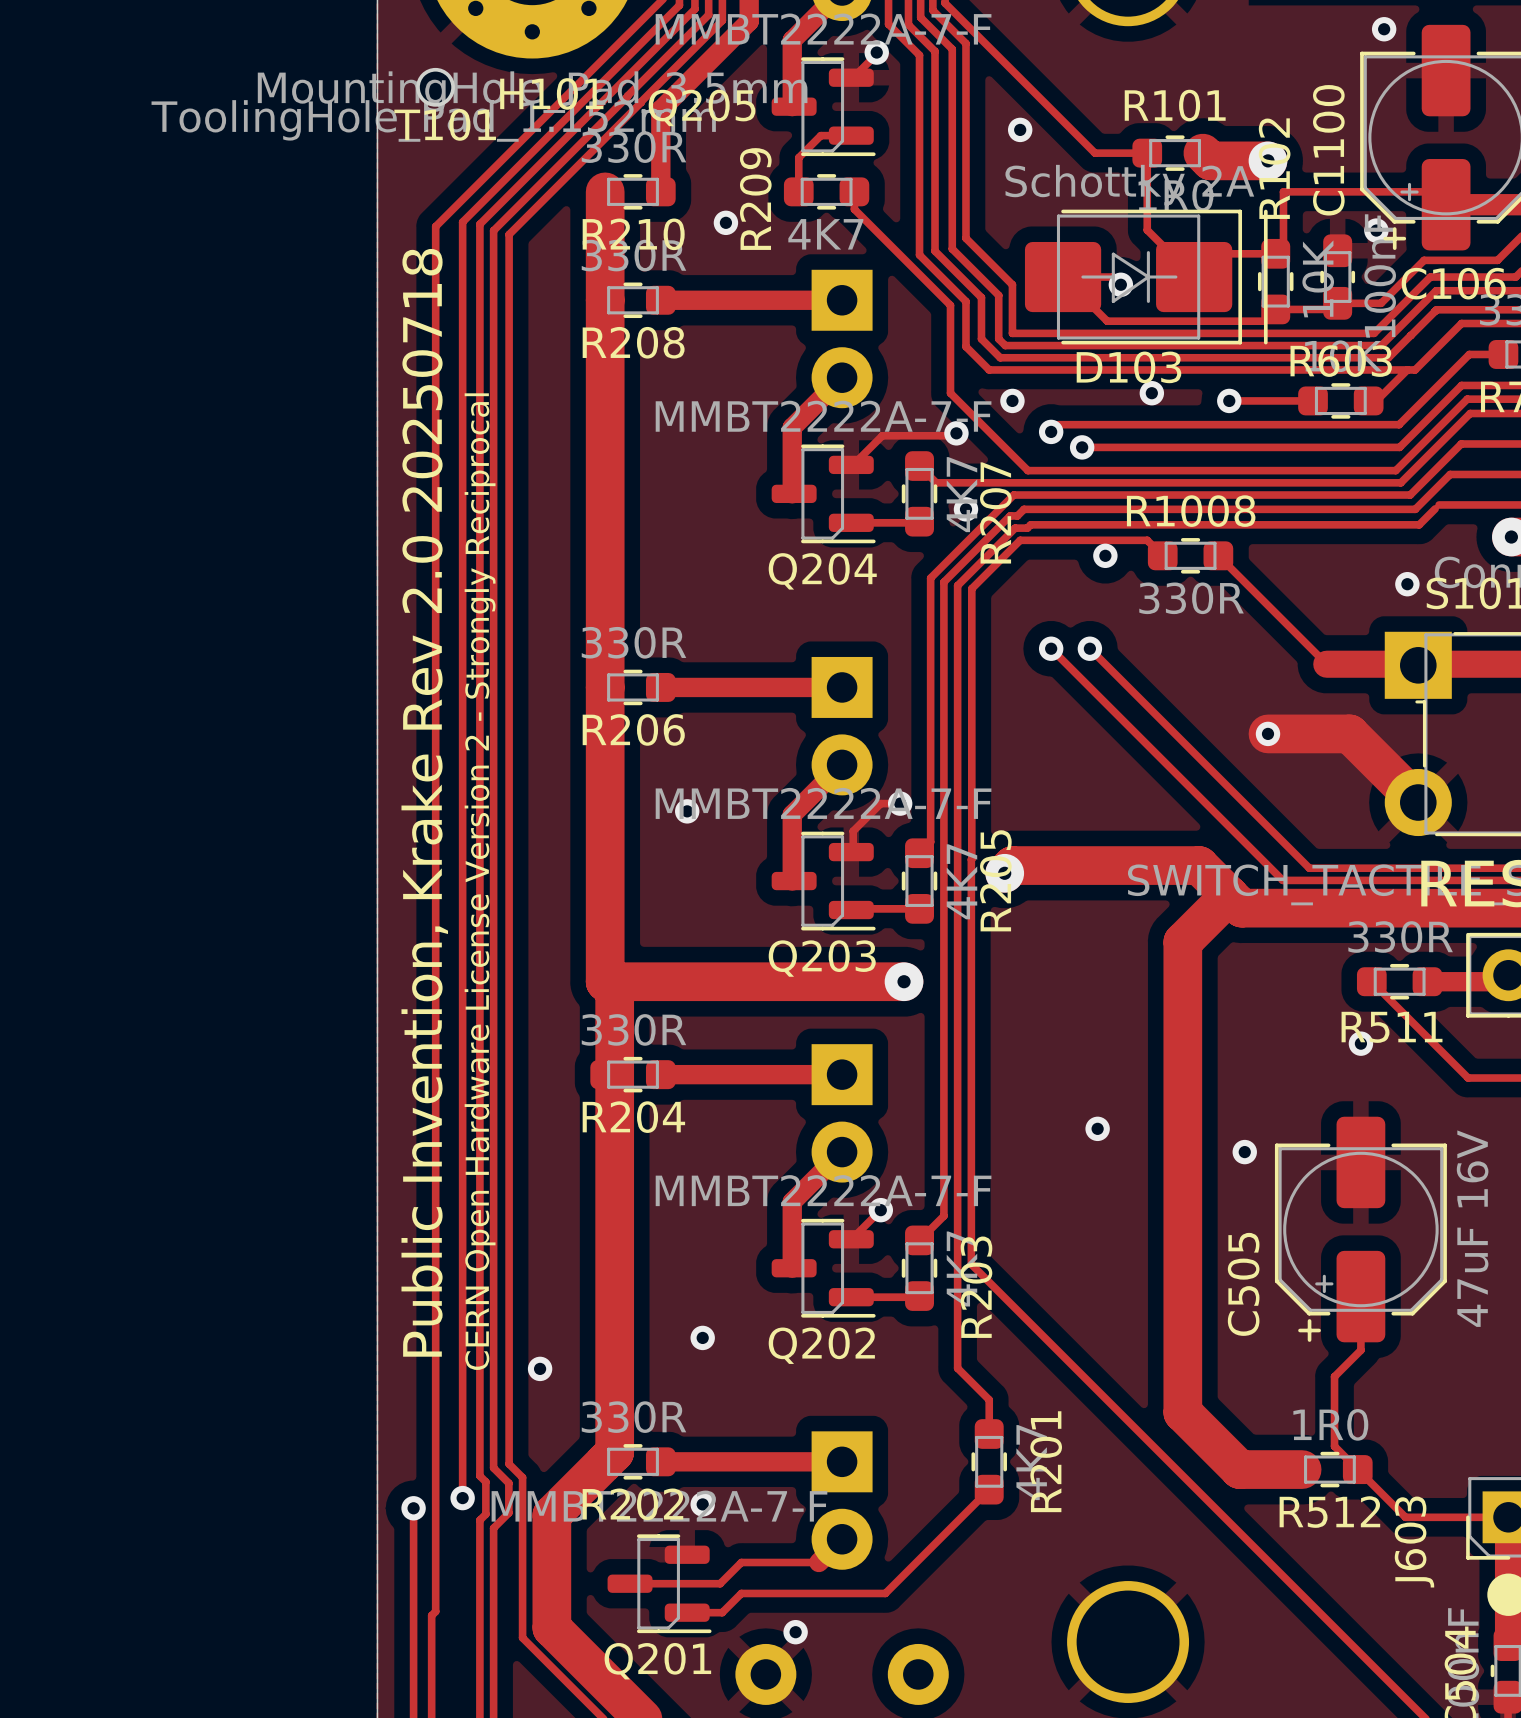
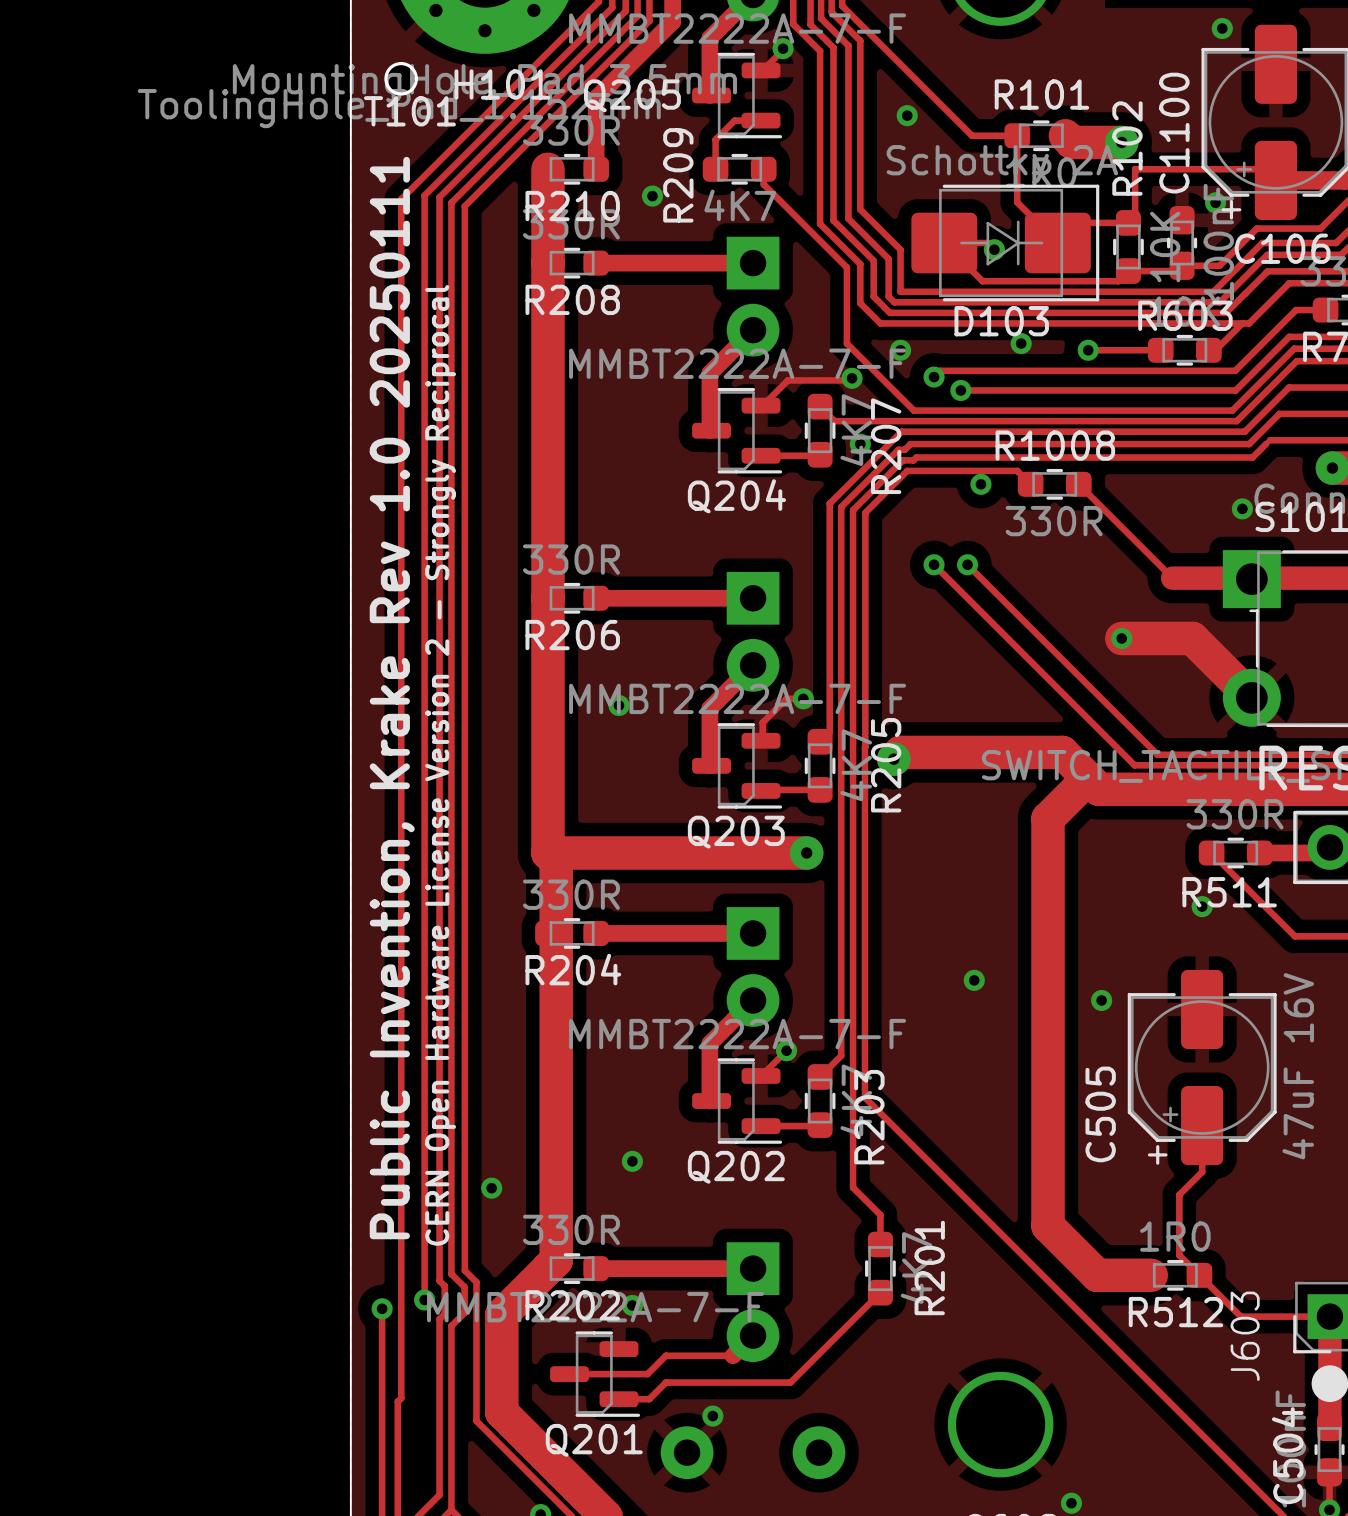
D103 footprint: [1024, 209, 1268, 345] -> [911, 184, 1100, 302]
text: Public Invention, Krake Rev 2.0 20250718 (424, 802) -> Public Invention, Krake Rev 1.0 20250111 (392, 698)

